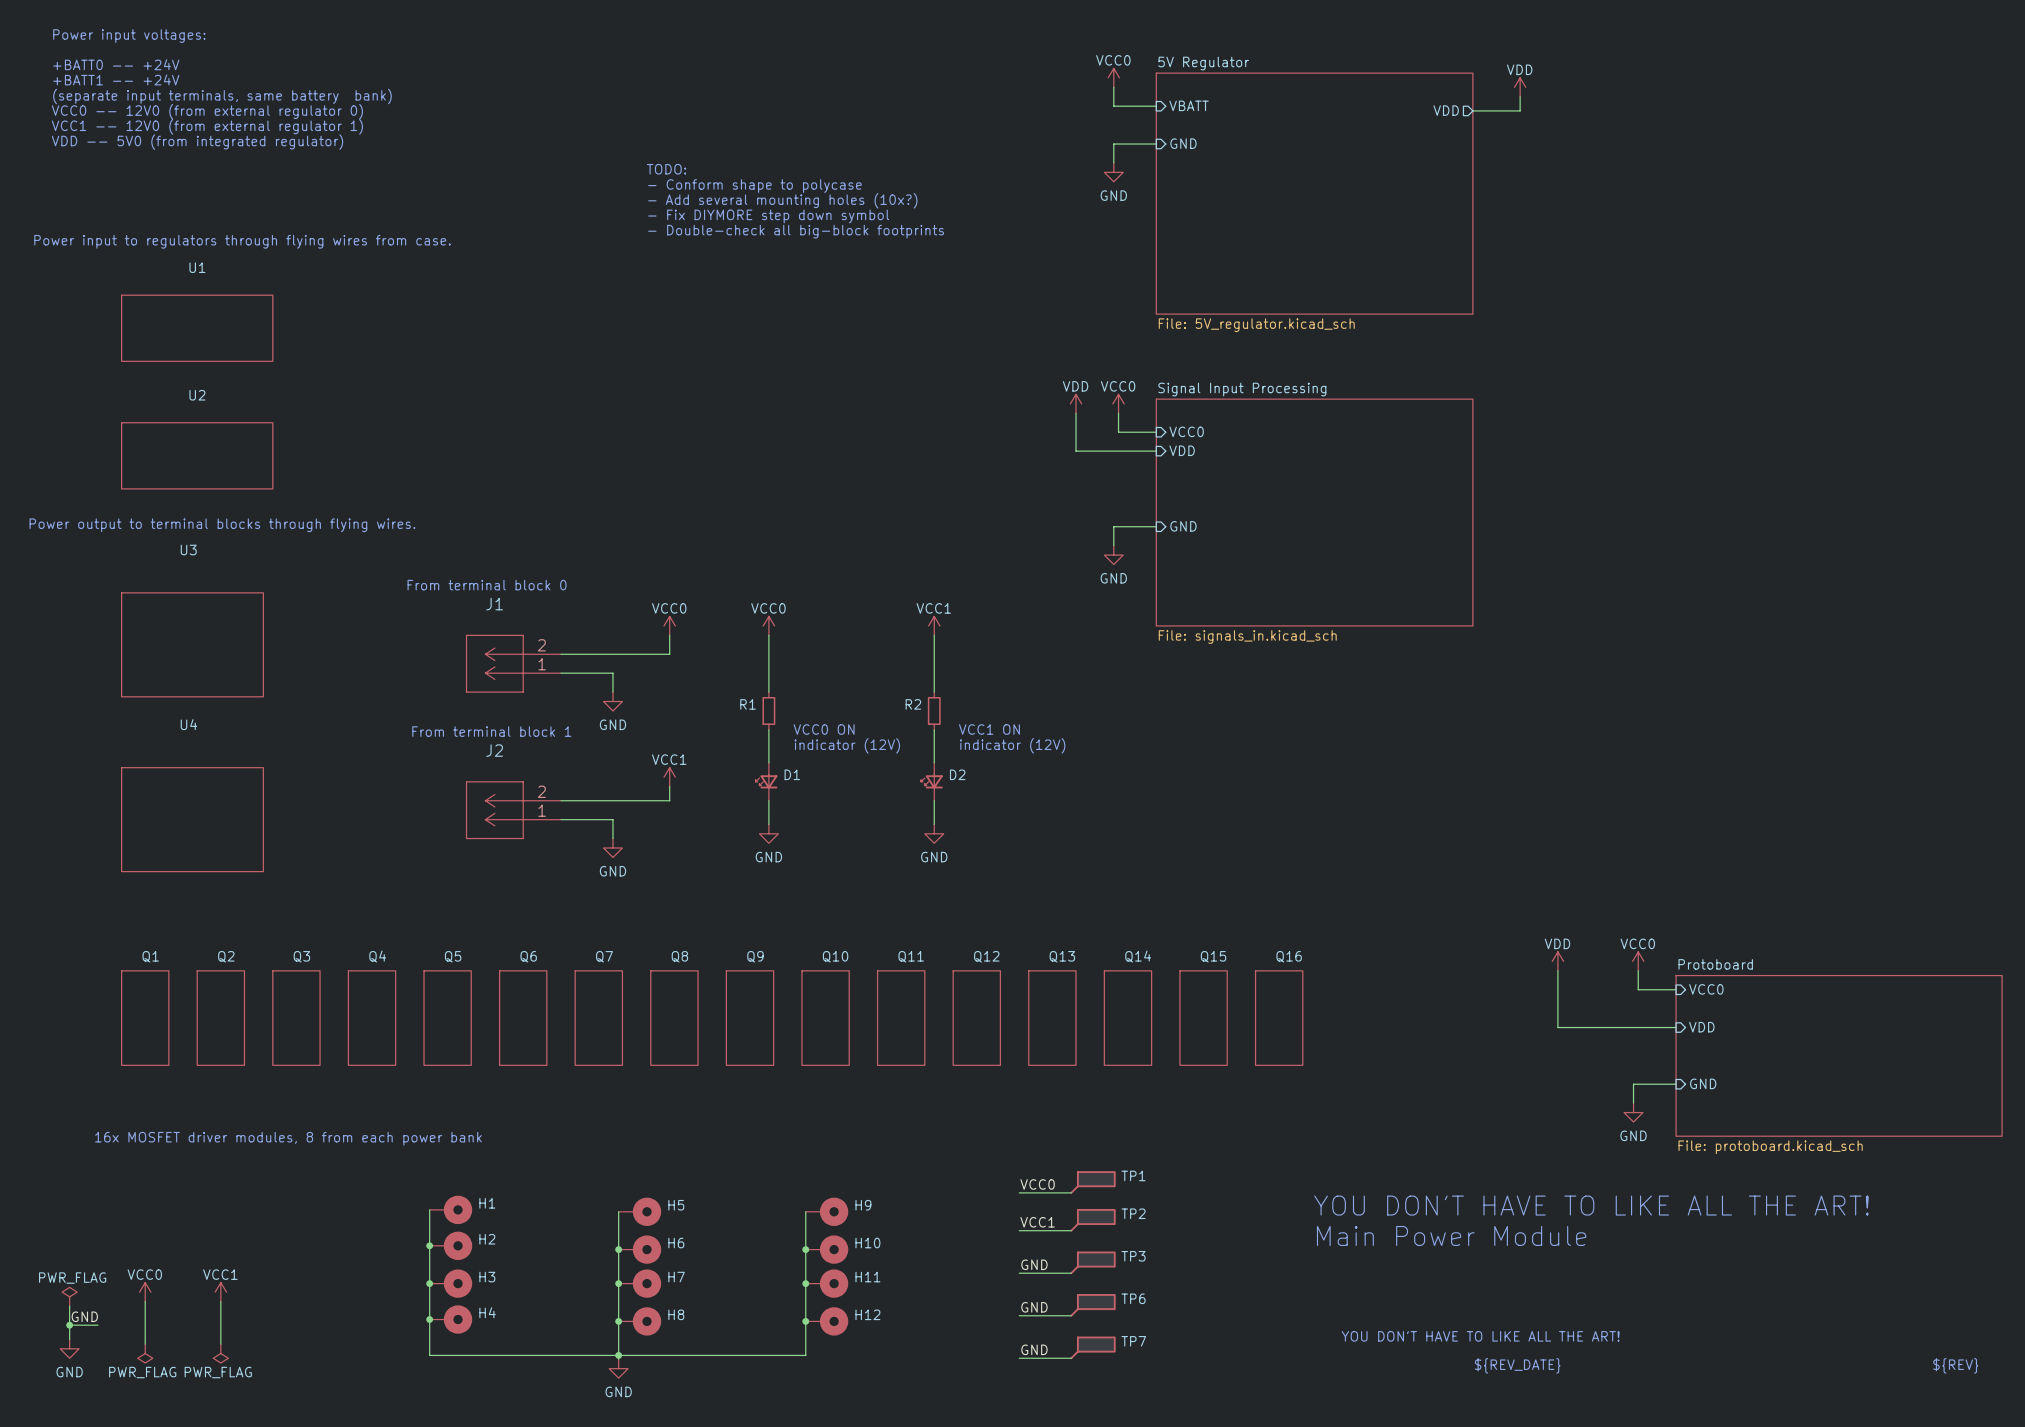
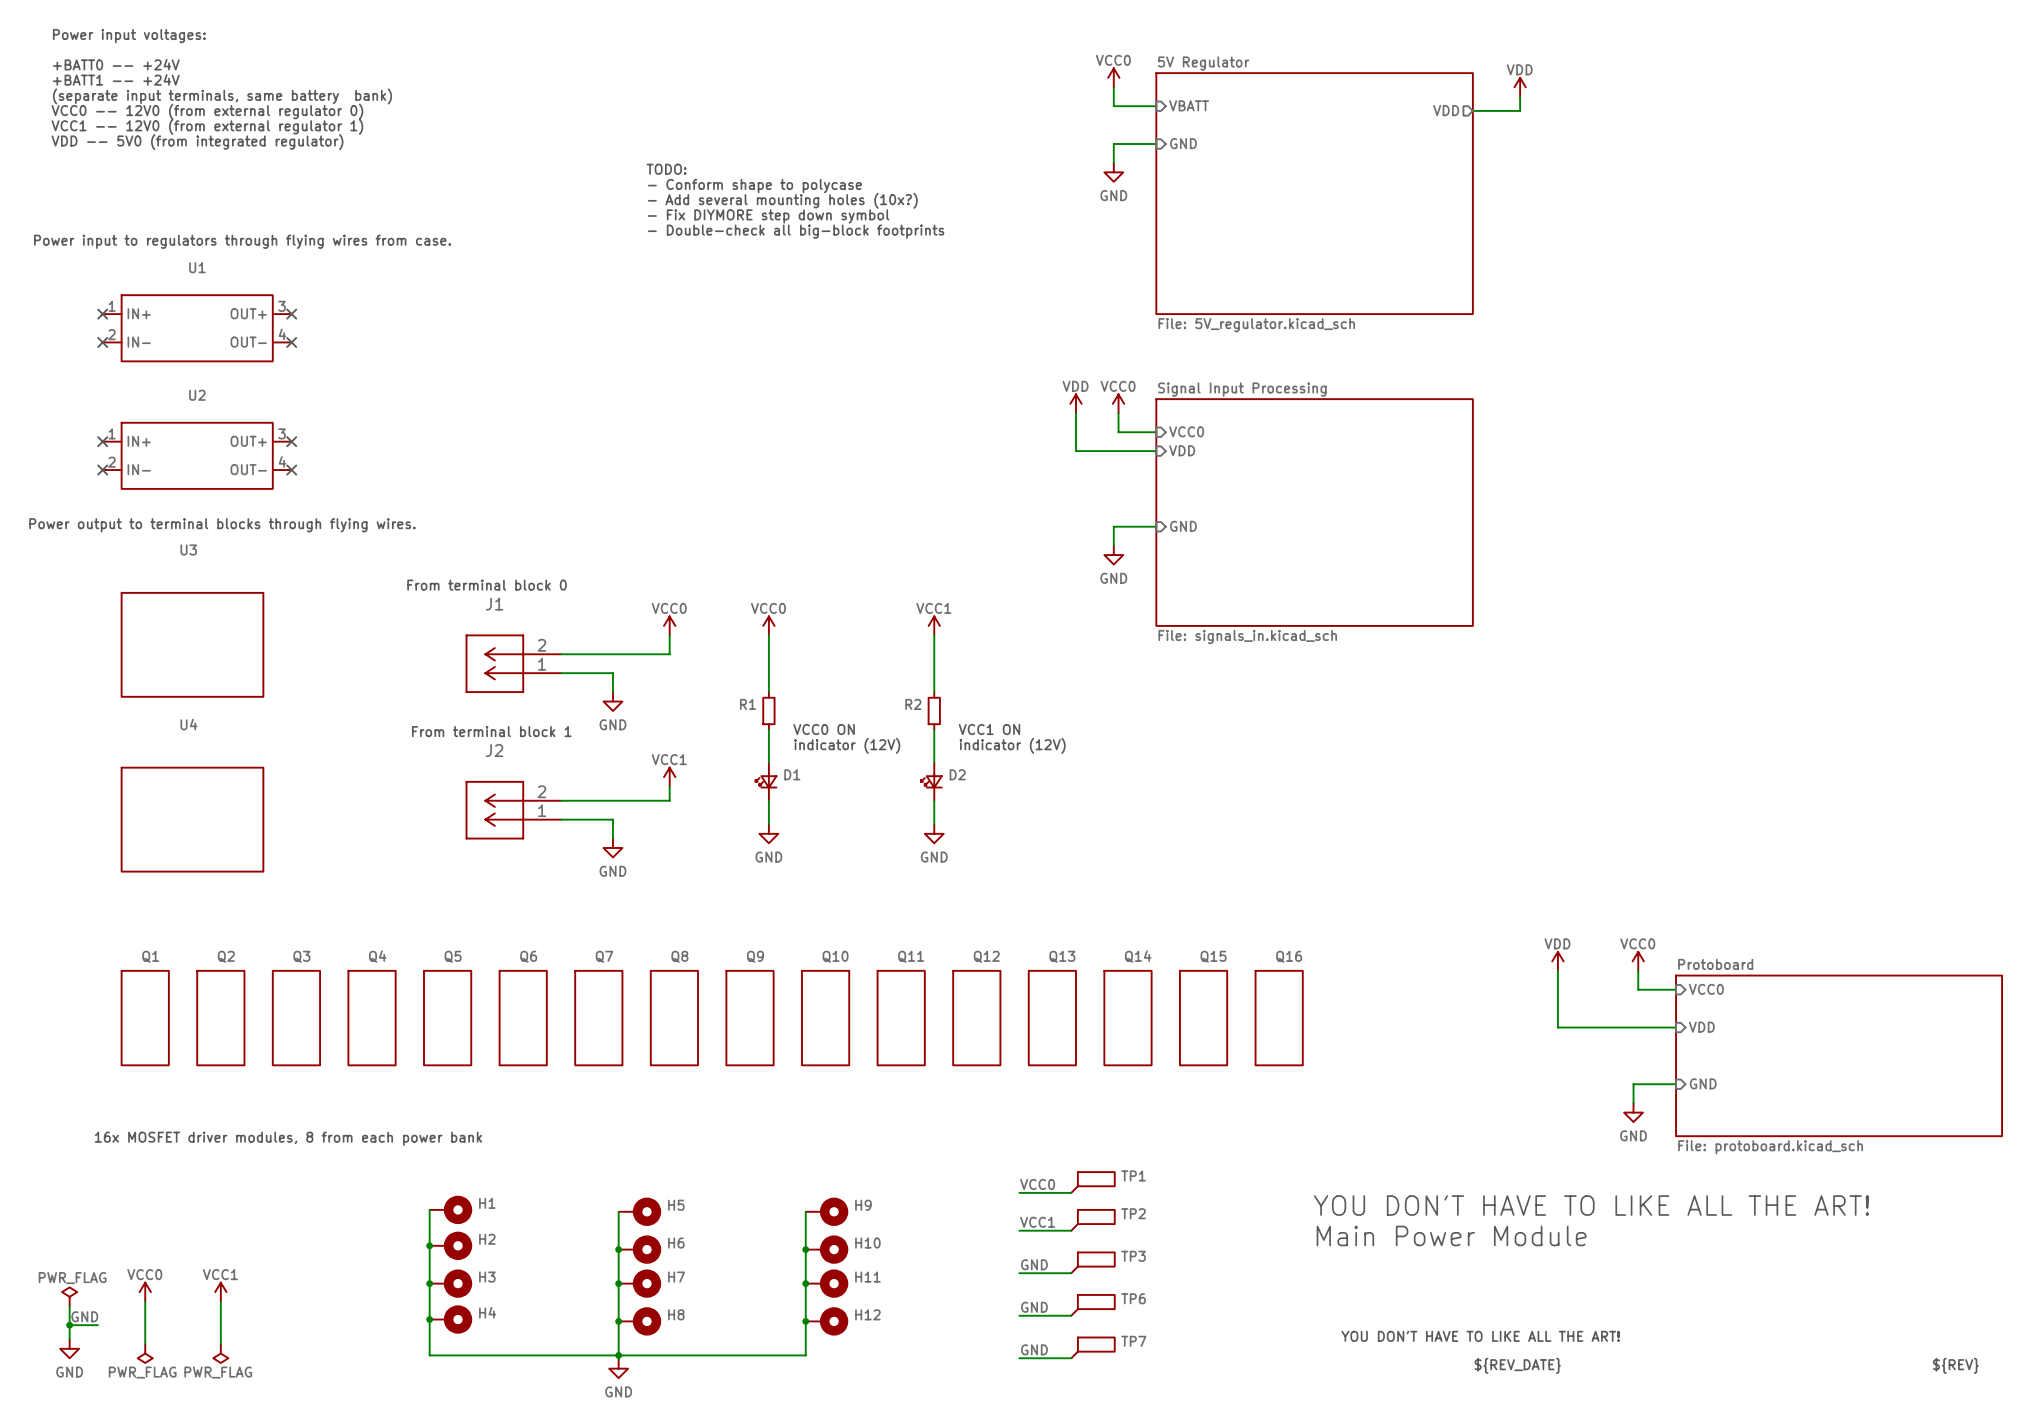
U1 symbol: [121, 294, 274, 362] -> [102, 294, 292, 362]
no-connect mark: none -> (102, 314)
no-connect mark: none -> (291, 314)
no-connect mark: none -> (102, 342)
no-connect mark: none -> (291, 342)
U2 symbol: [121, 422, 274, 490] -> [102, 422, 292, 490]
no-connect mark: none -> (102, 441)
no-connect mark: none -> (291, 441)
no-connect mark: none -> (102, 470)
no-connect mark: none -> (291, 470)

